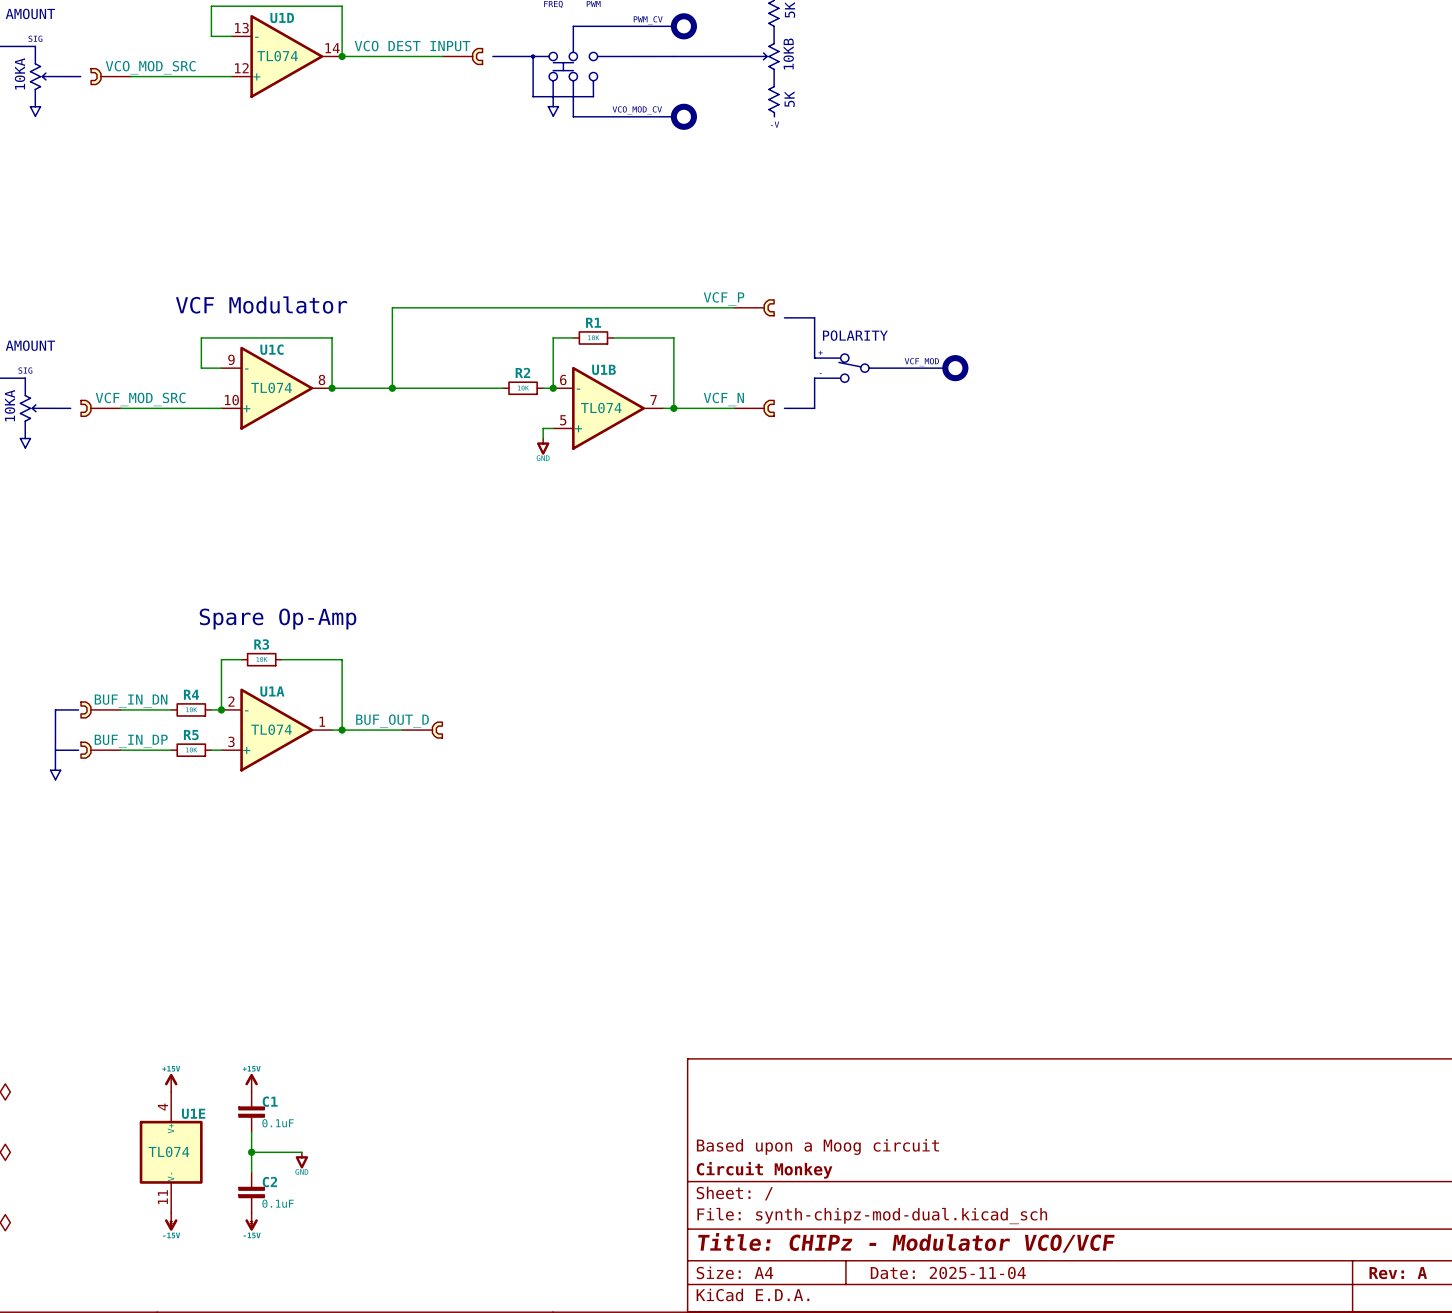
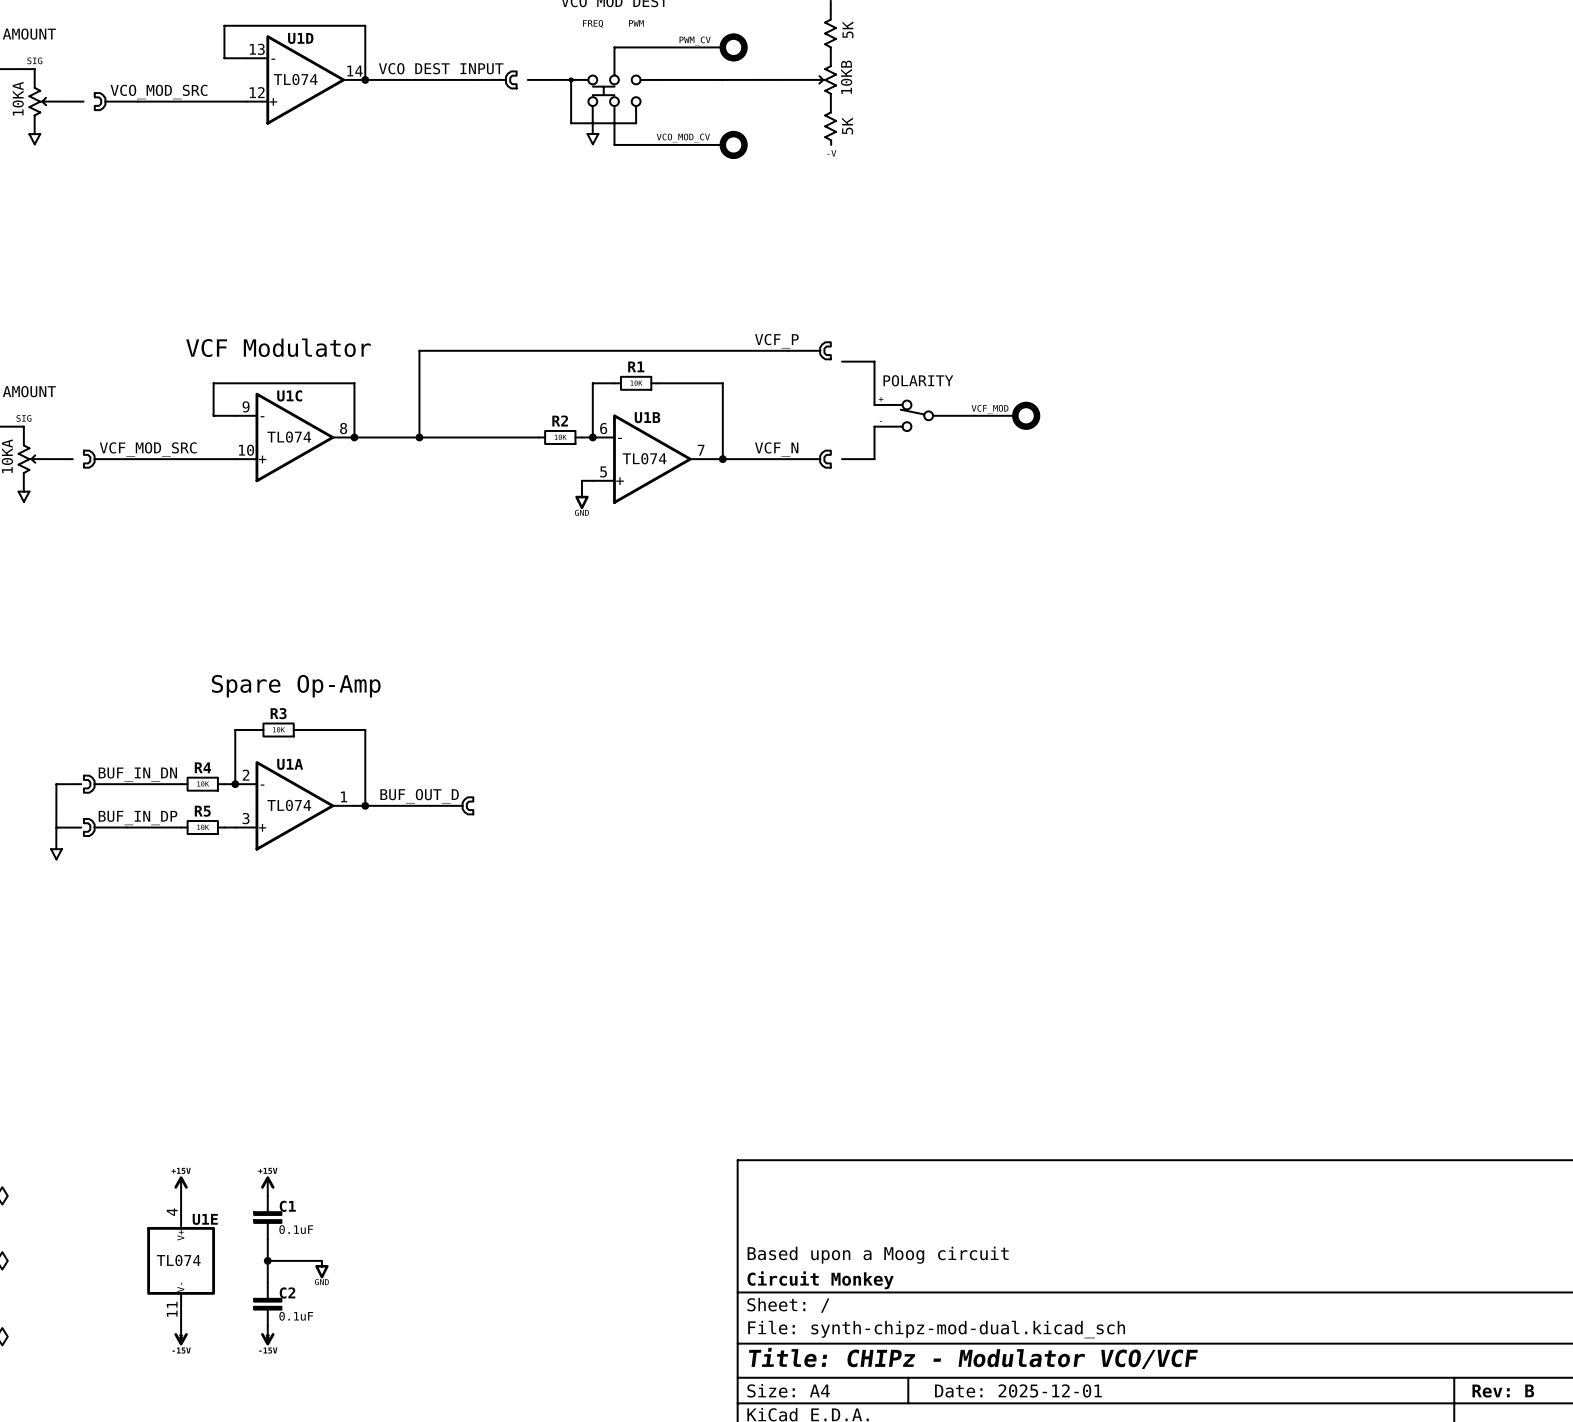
title block: Date: 2025-11-04 (948, 1272) -> Date: 2025-12-01 (1018, 1390)
title block: Rev: A (1398, 1273) -> Rev: B (1503, 1391)

